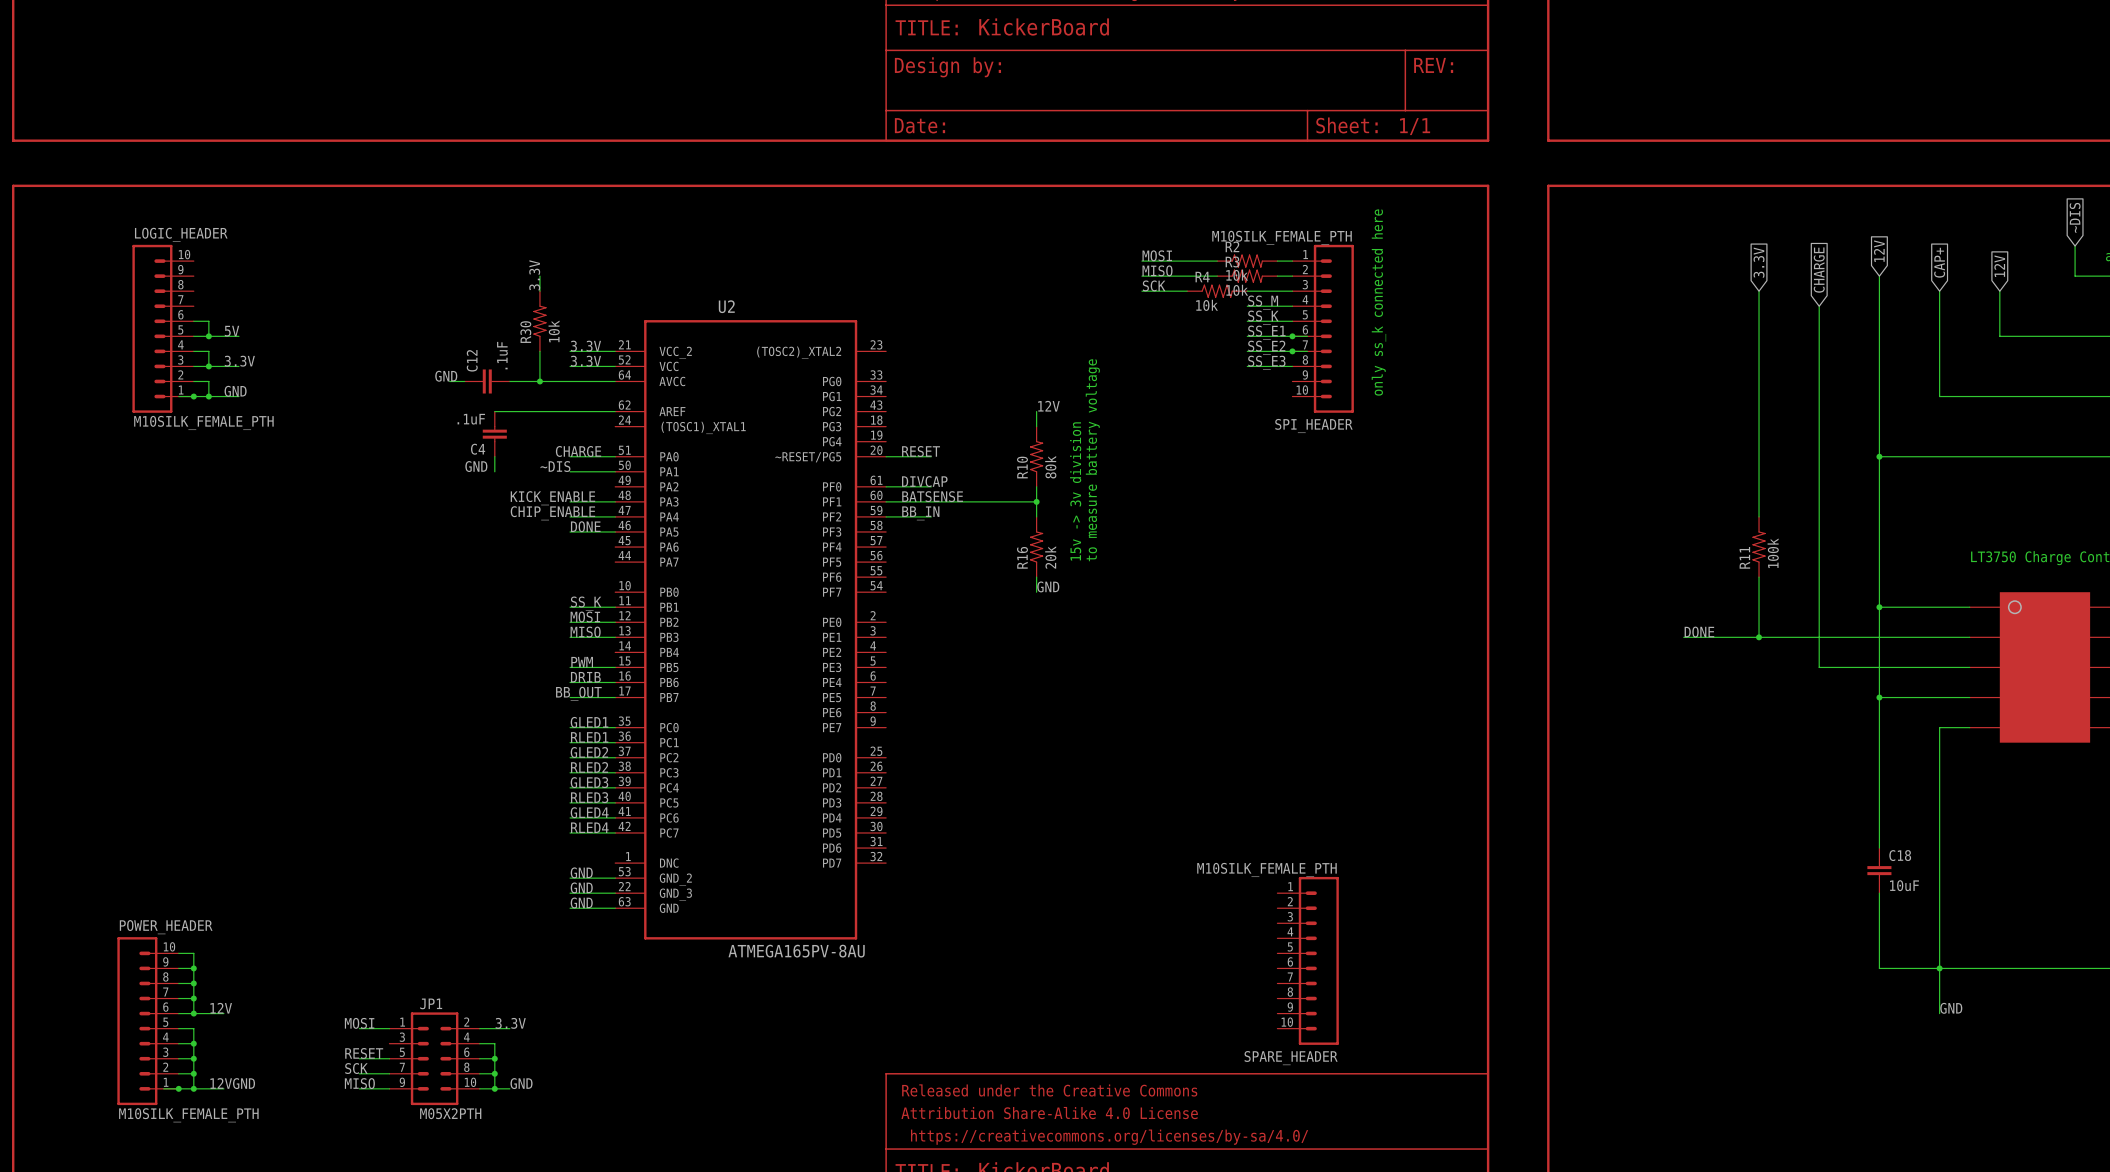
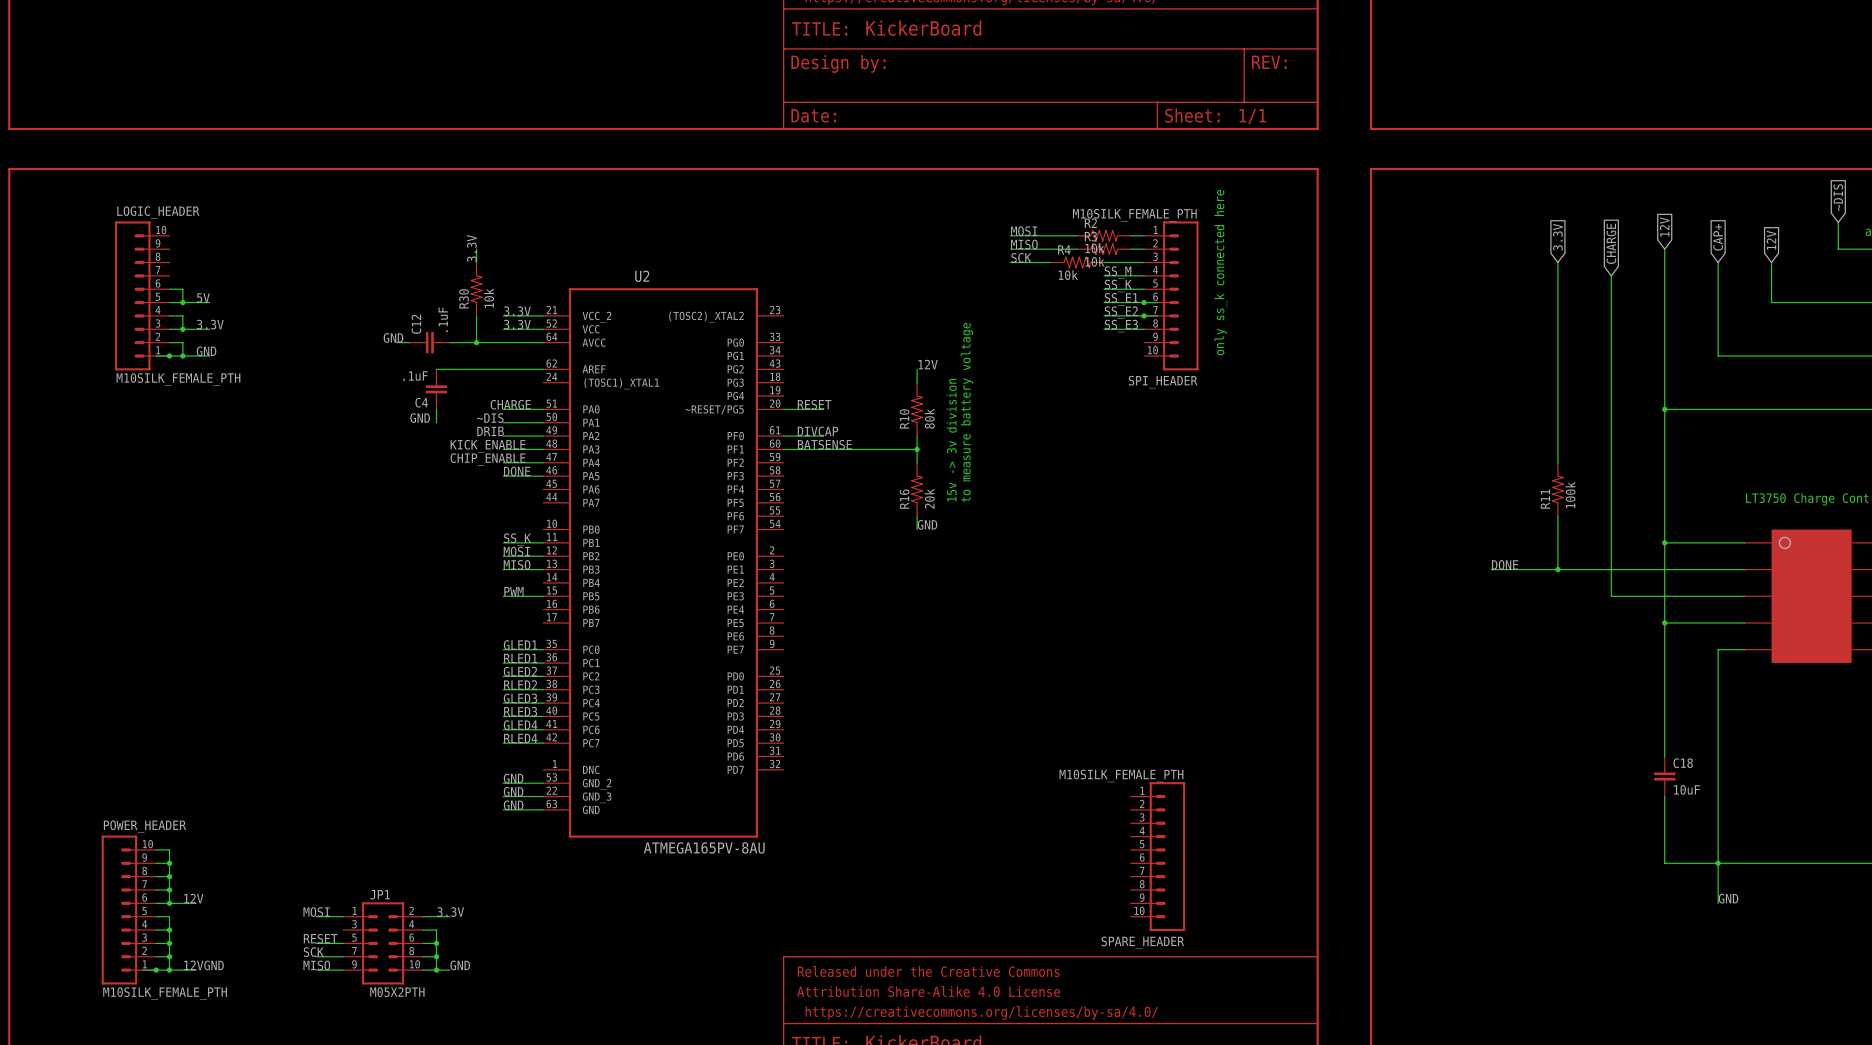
label: none -> DRIB (490, 431)
wire: none -> (503, 436) (543, 436)
label: BB_IN (920, 513) -> none
wire: (886, 516) (931, 516) -> none
label: DRIB (585, 677) -> none
wire: (570, 682) (615, 682) -> none
label: BB_OUT (578, 693) -> none
wire: (570, 697) (615, 697) -> none

